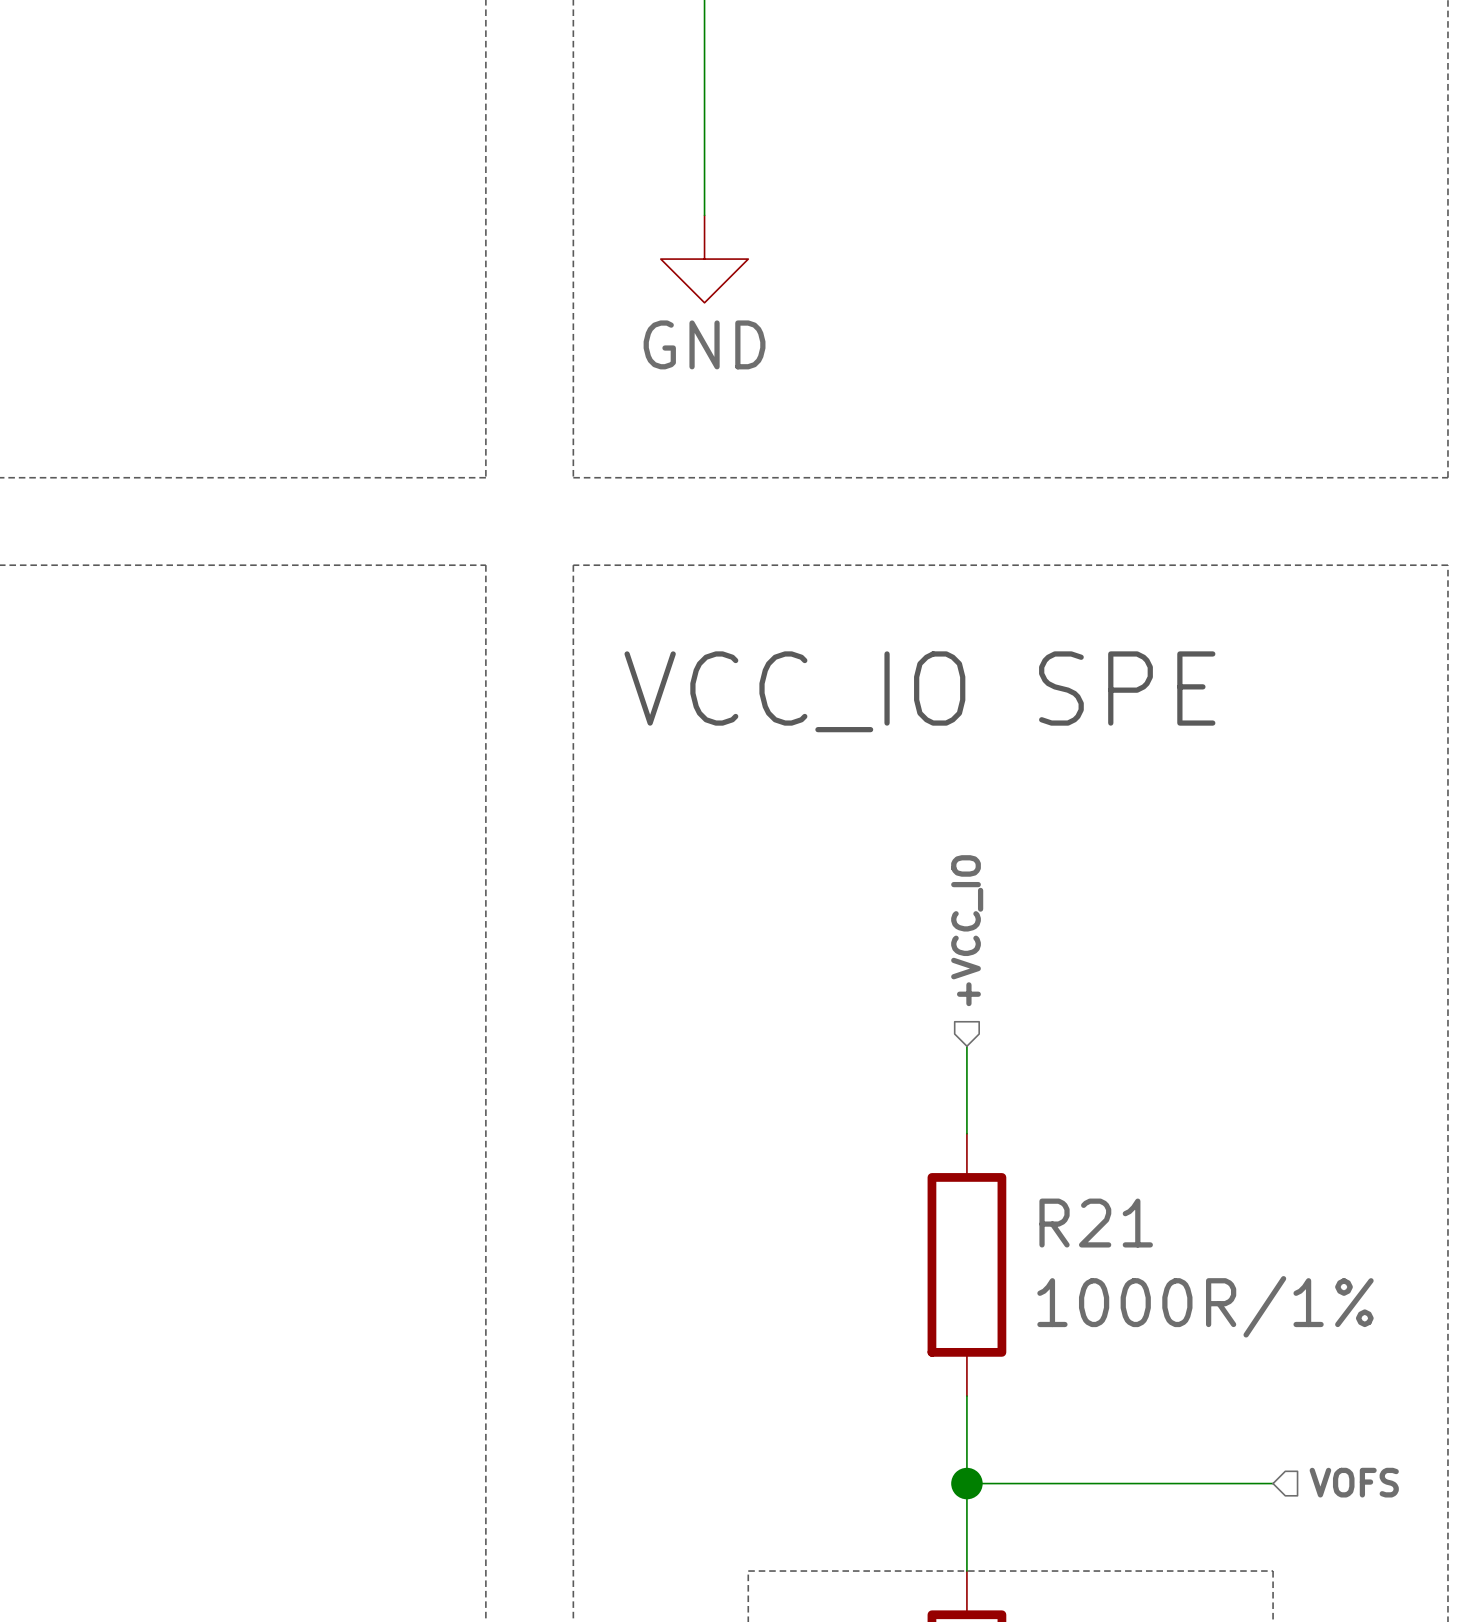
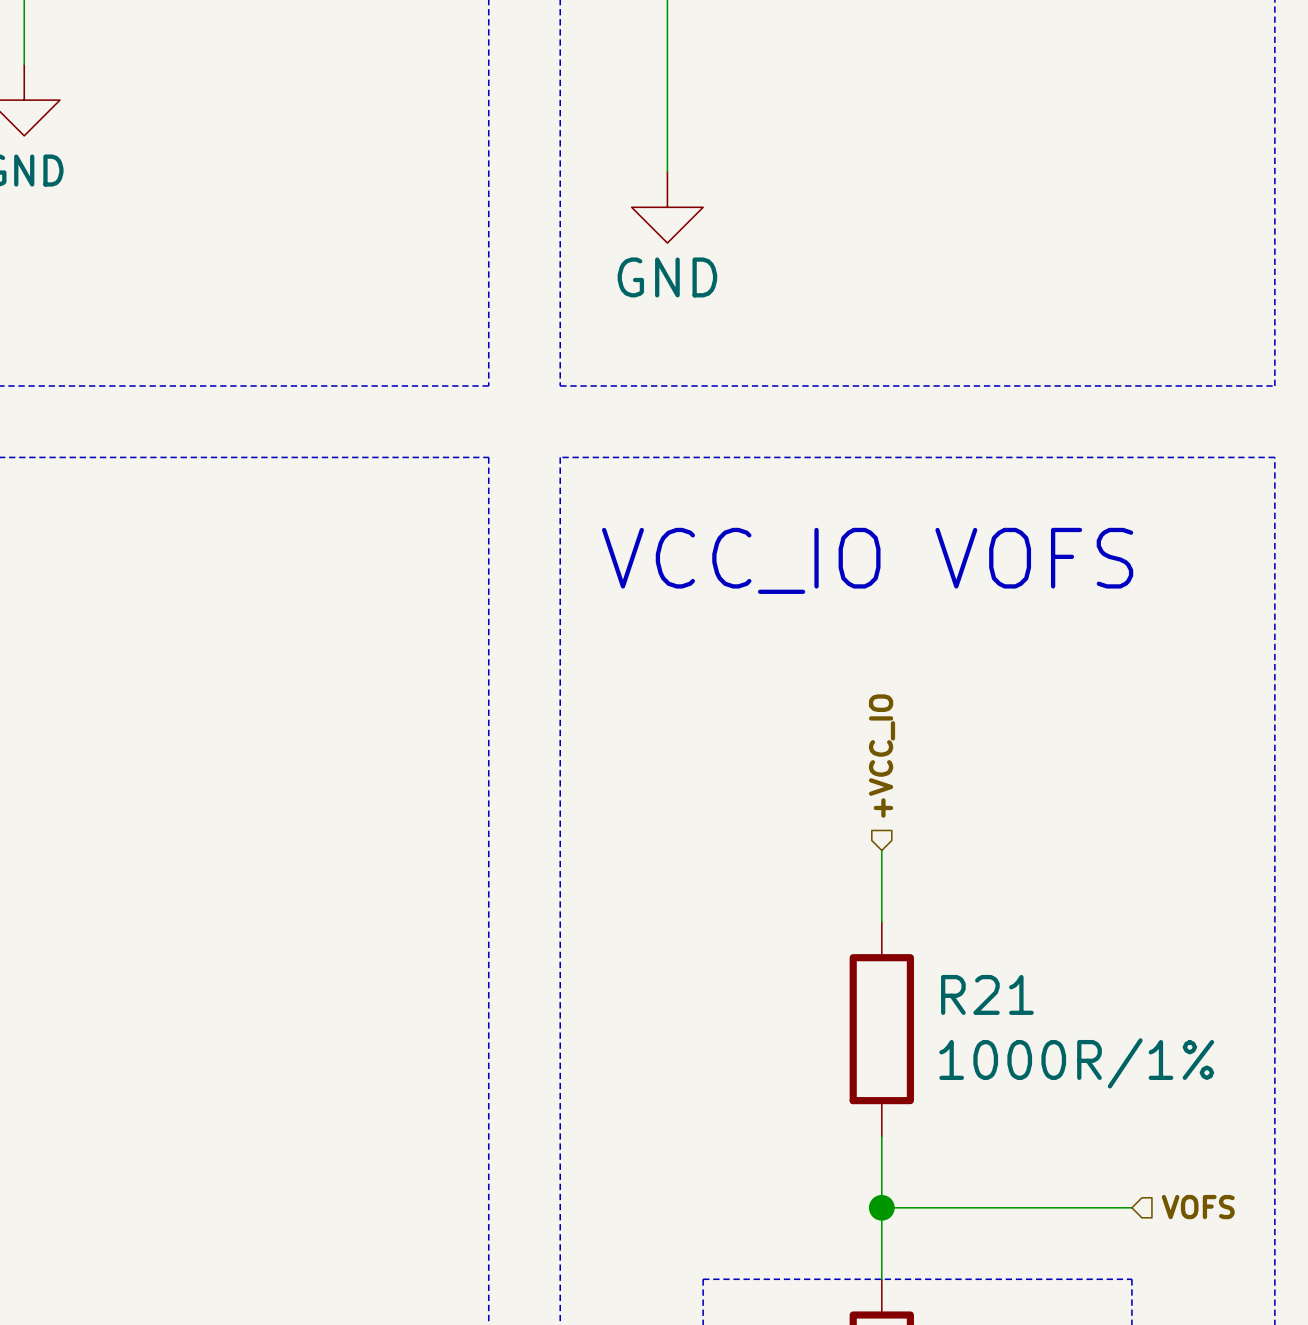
text: VCC_IO SPE (919, 691) -> VCC_IO VOFS (867, 560)

